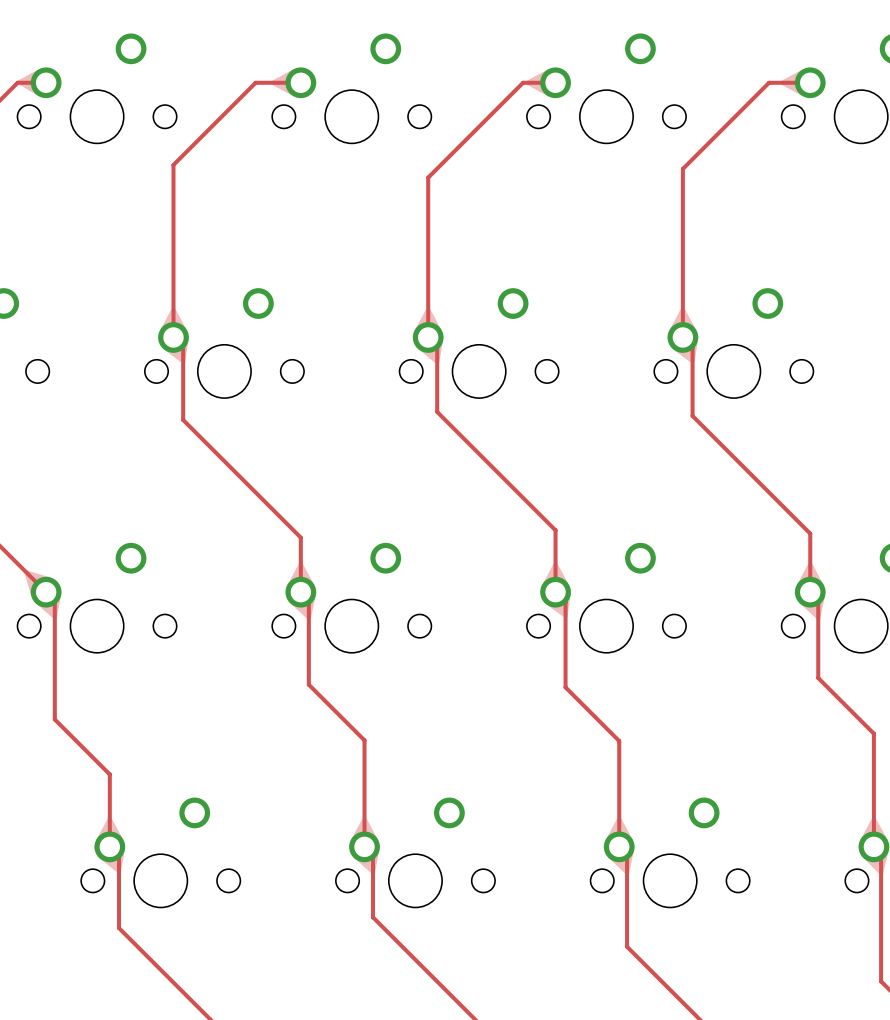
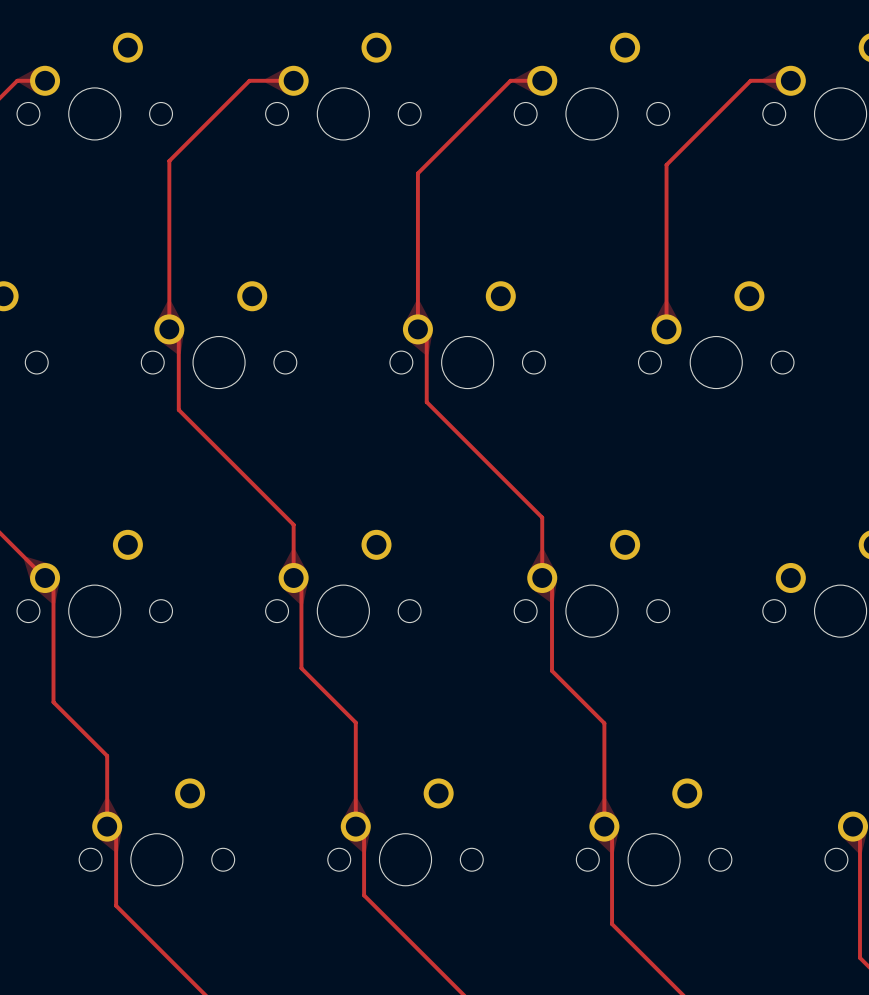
track: (682, 337) (692, 347) (692, 415) (810, 533) (810, 592) (818, 600) (818, 678) (873, 733) (873, 846) -> none

